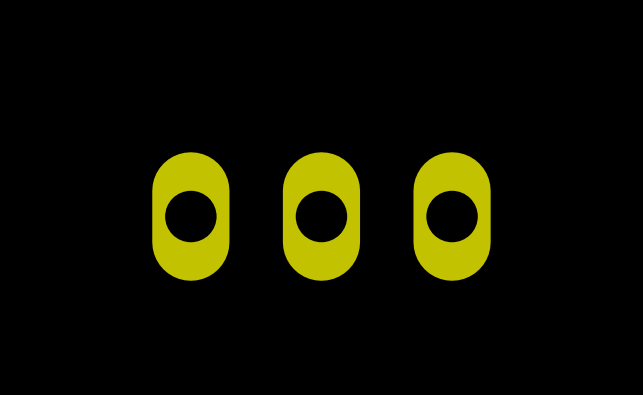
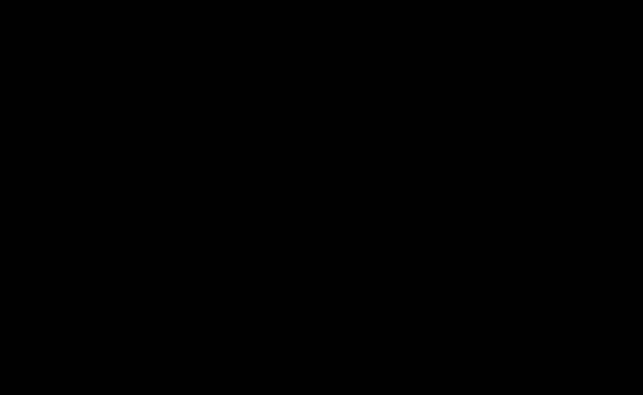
part: (321, 216) -> none

